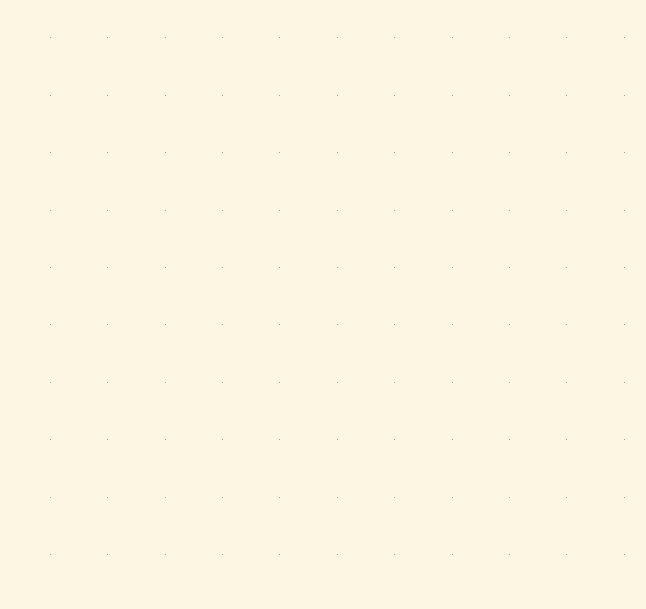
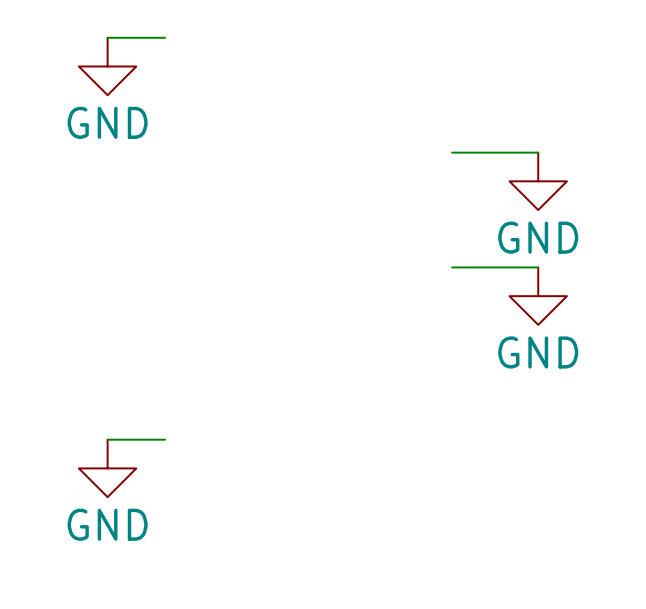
wire: none -> (107, 37) (165, 37)
power symbol: none -> GND (107, 66)
wire: none -> (452, 152) (538, 152)
power symbol: none -> GND (538, 181)
wire: none -> (452, 267) (538, 267)
power symbol: none -> GND (538, 296)
wire: none -> (107, 439) (165, 439)
power symbol: none -> GND (107, 468)

